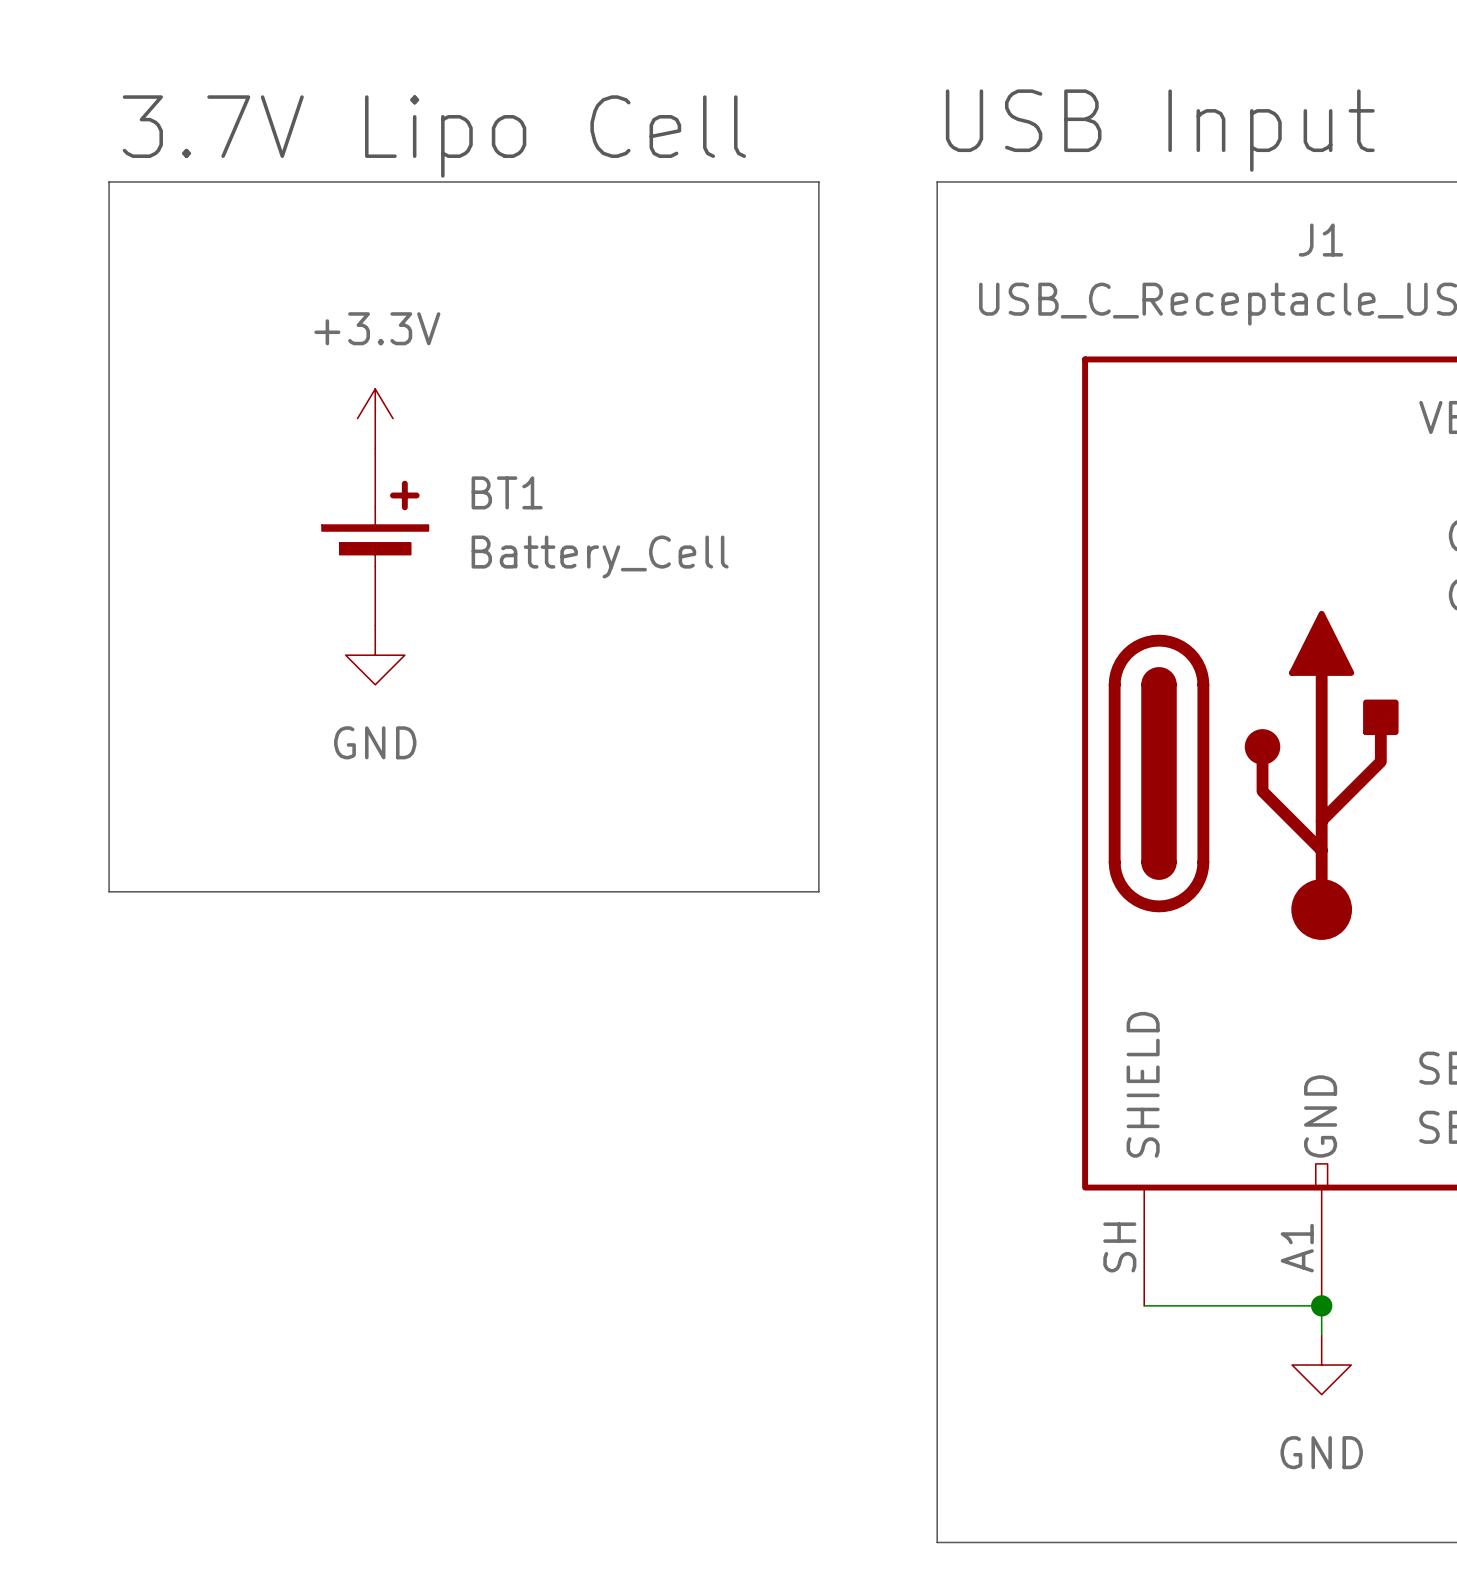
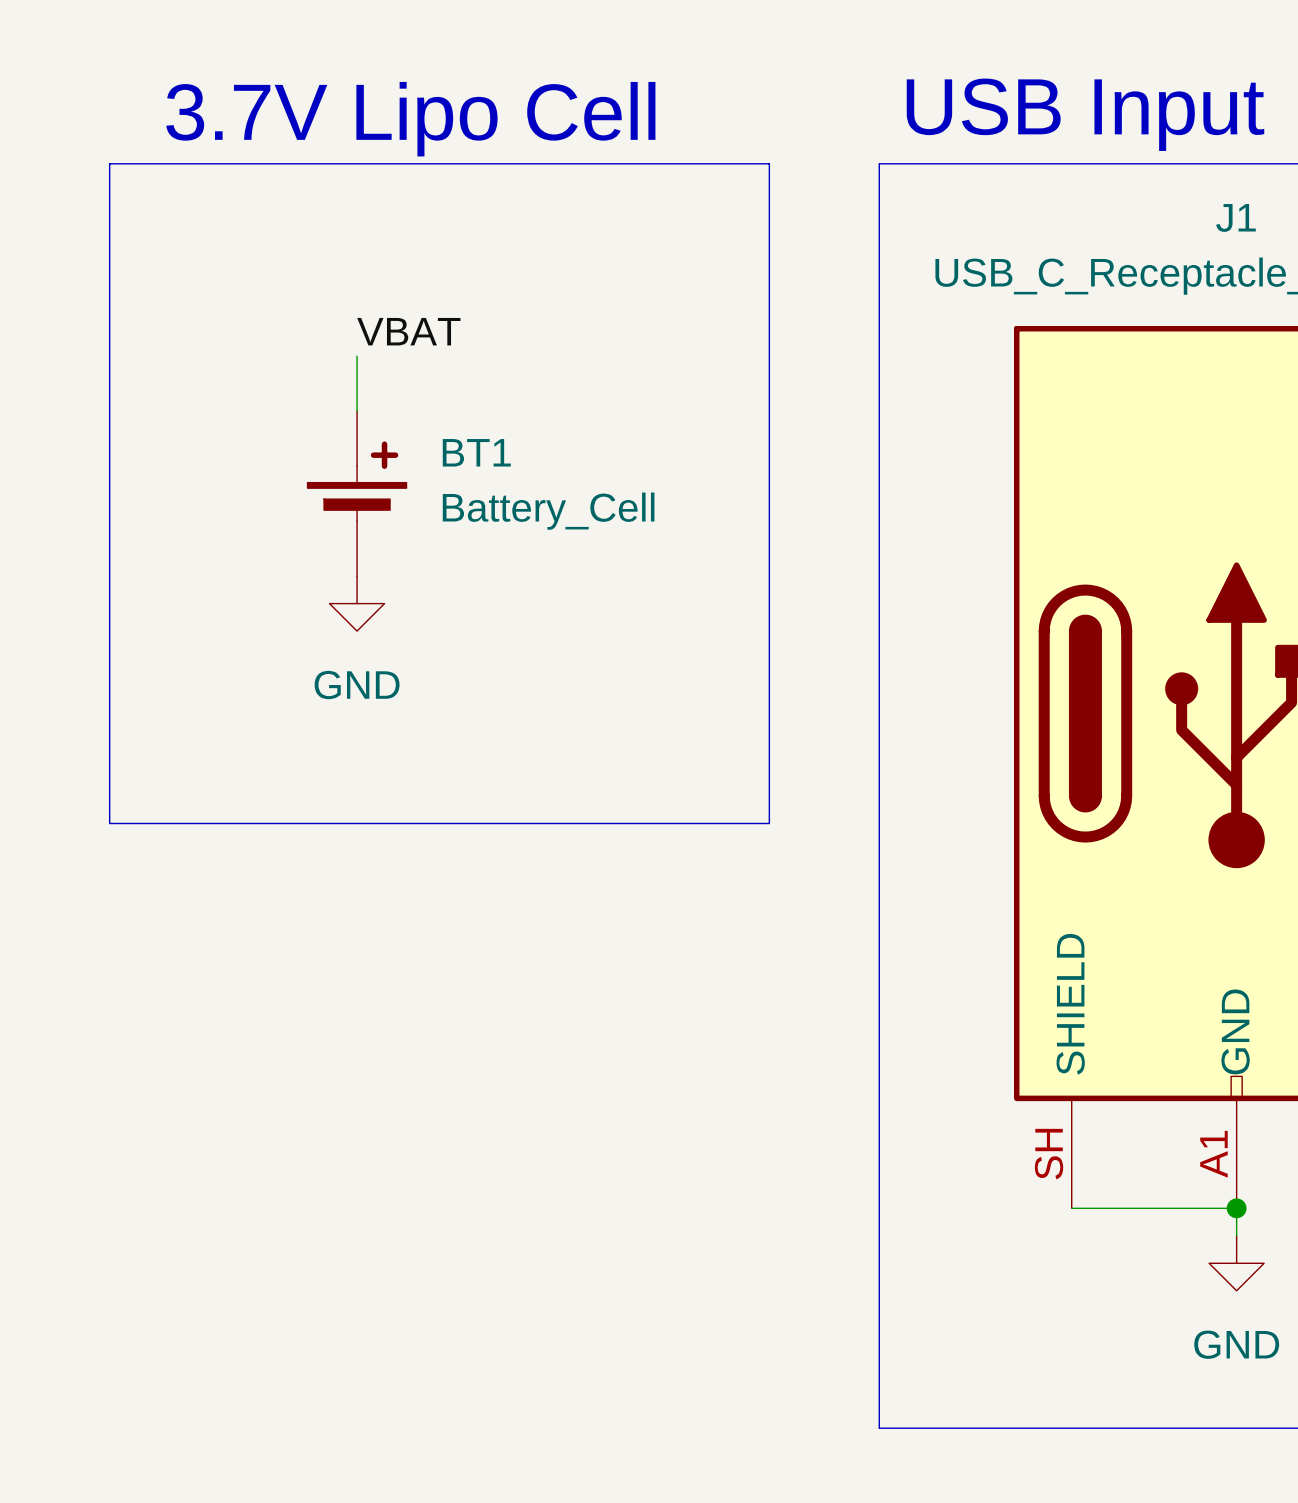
label: none -> VBAT (408, 331)
power symbol: +3.3V (375, 418) -> none

